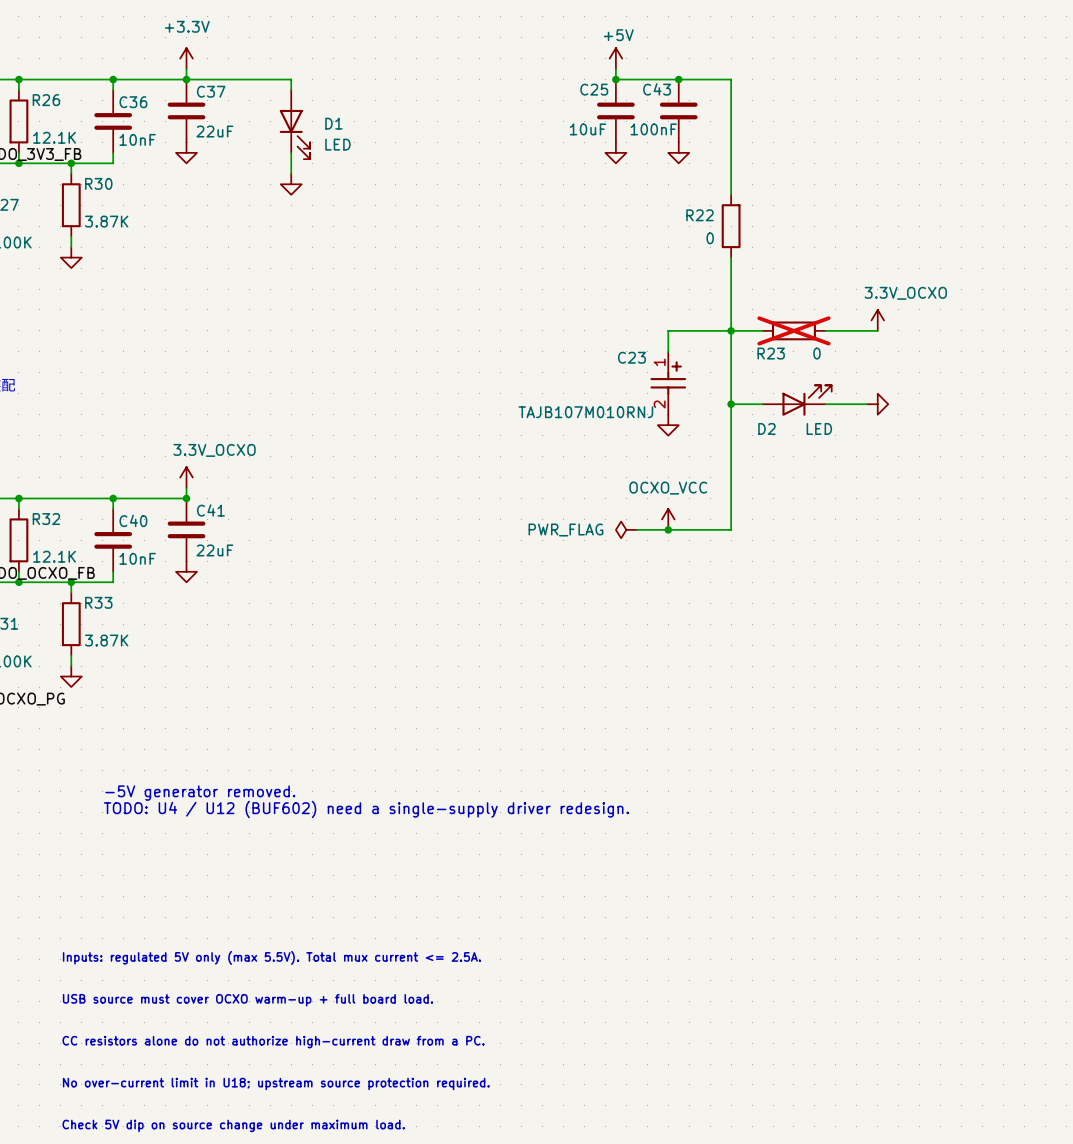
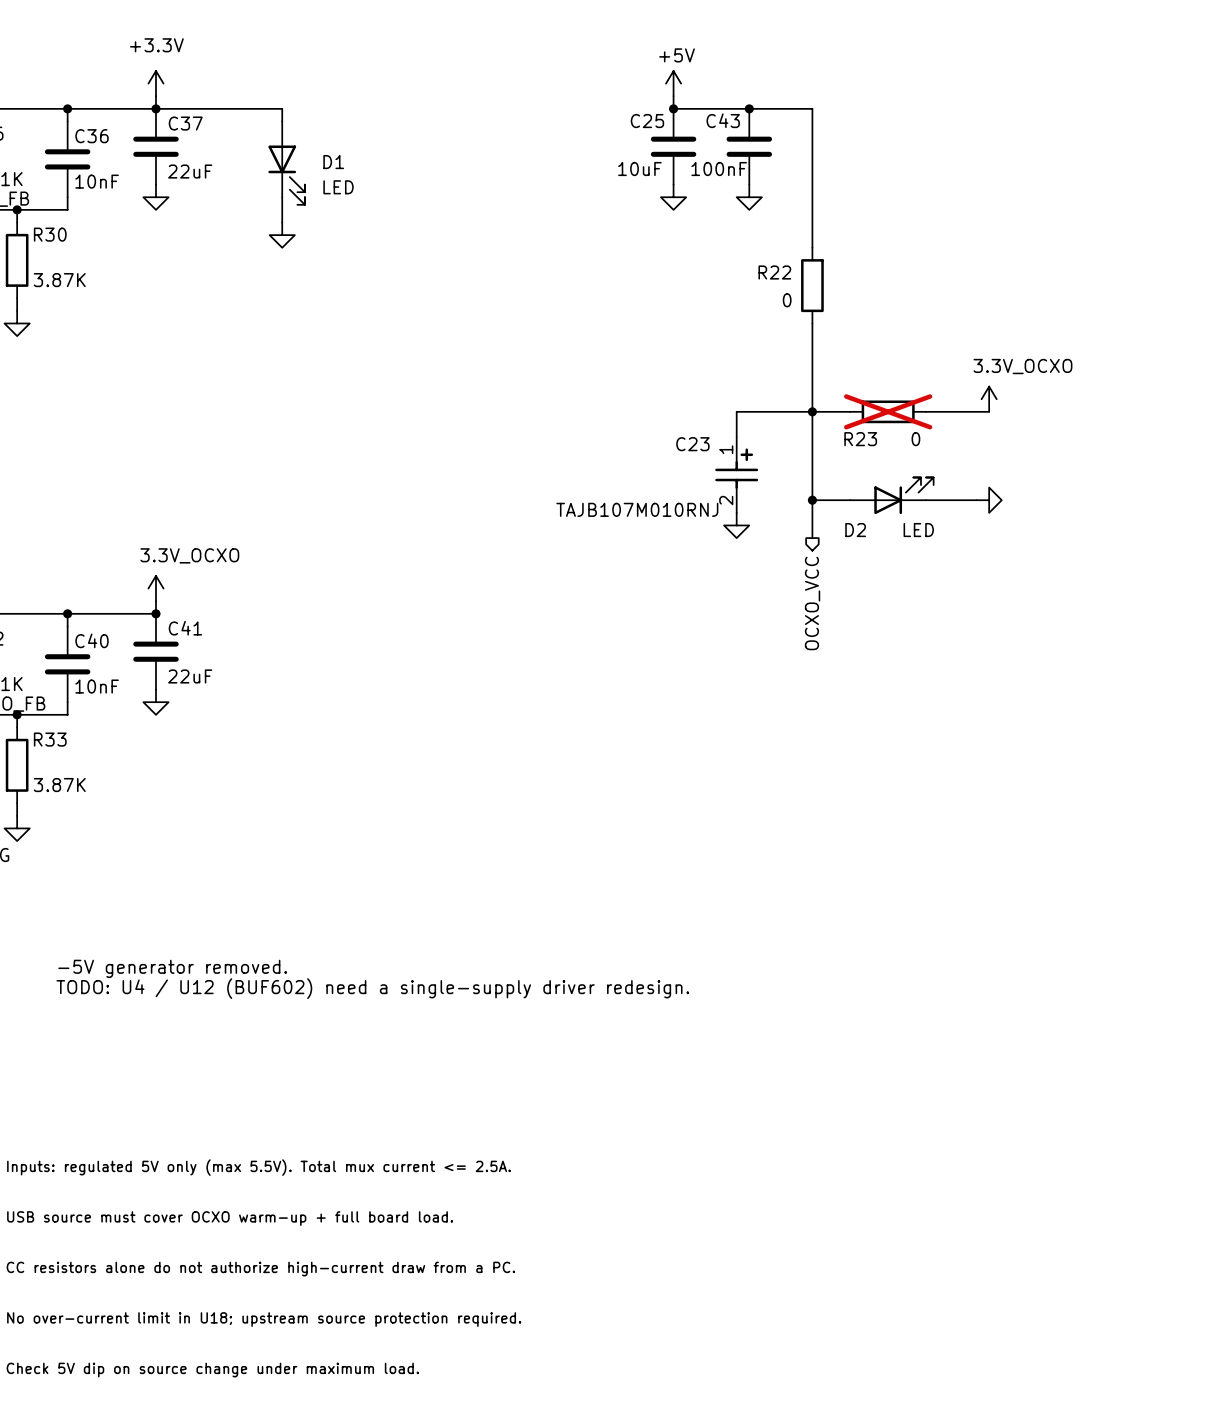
wire: (731, 435) (731, 529) (636, 529) -> none
hierarchical label: none -> OCXO_VCC (812, 603)
power symbol: OCXO_VCC (668, 519) -> none
power symbol: PWR_FLAG (626, 529) -> none
junction: (668, 529) -> none

